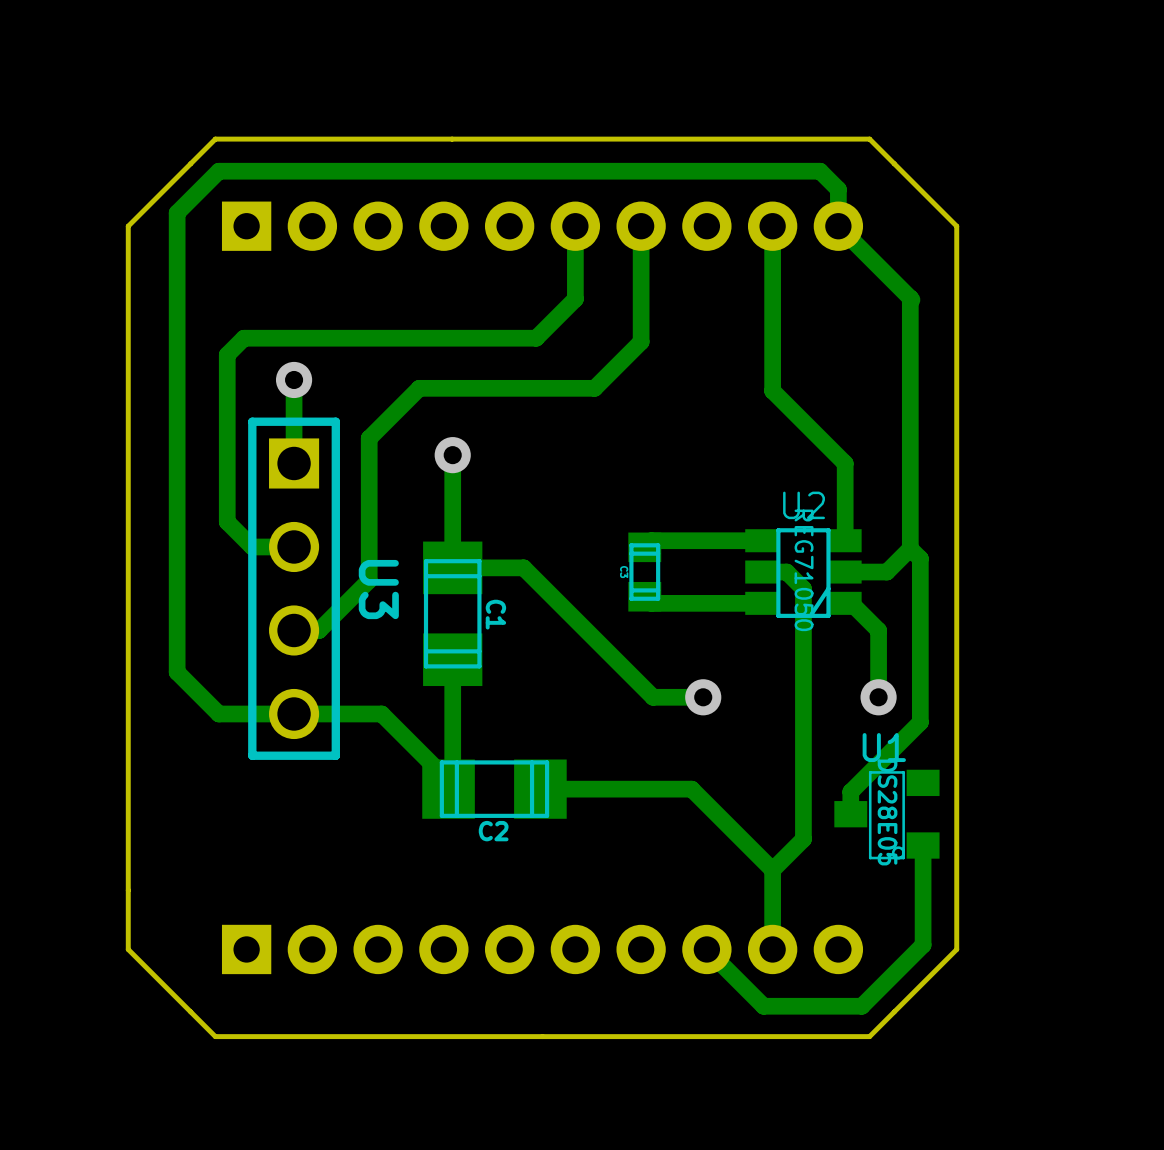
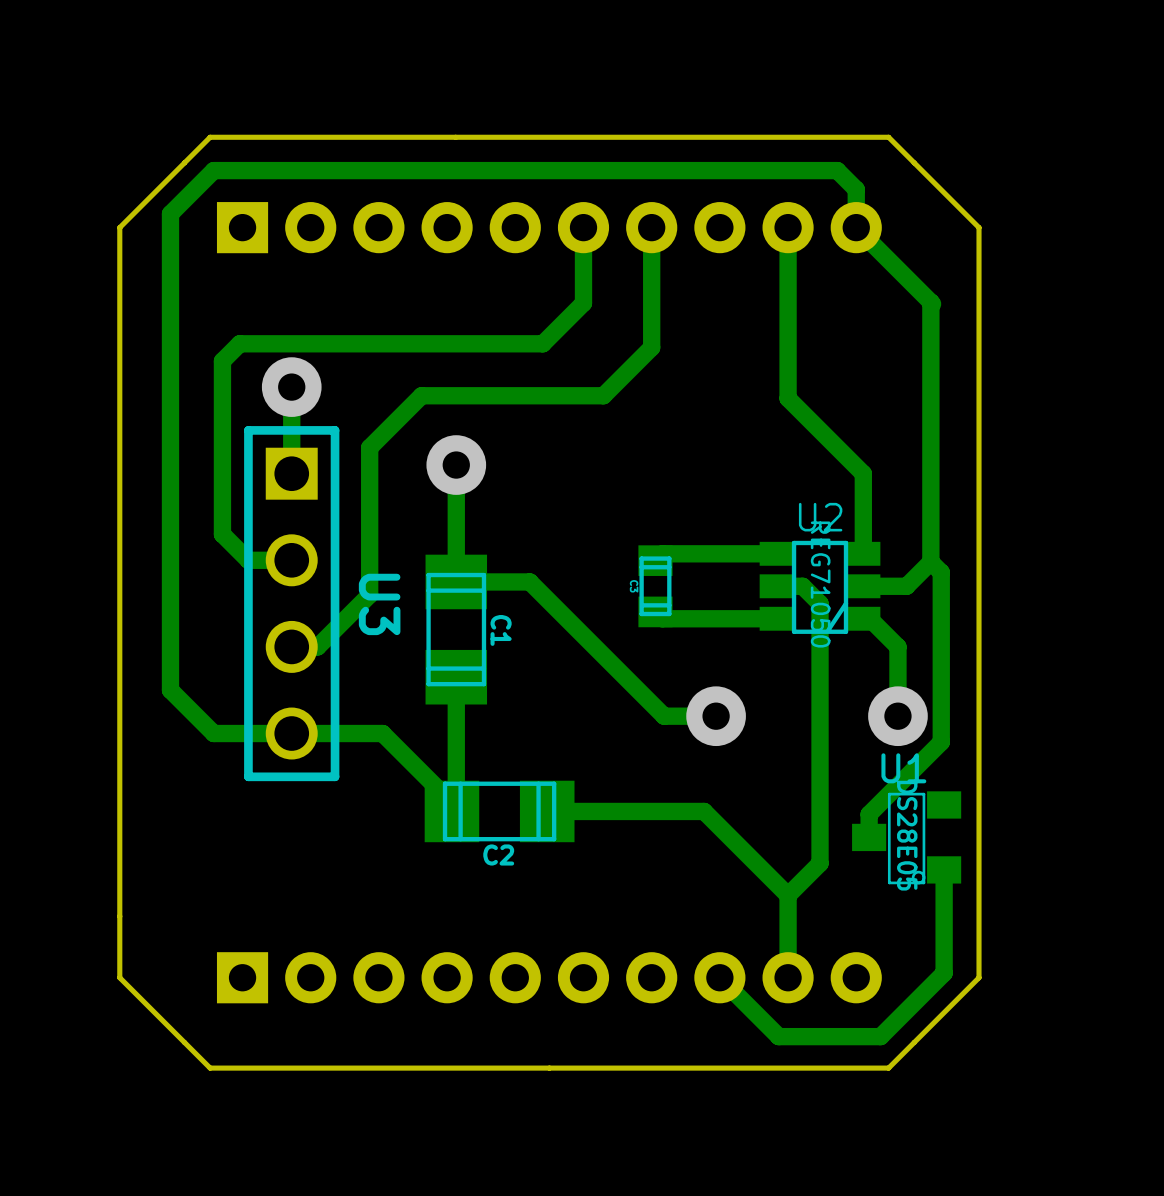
via size: [275, 361, 313, 399] -> [261, 357, 322, 417]
via size: [434, 437, 471, 474] -> [426, 435, 487, 495]
via size: [685, 679, 722, 716] -> [686, 686, 746, 747]
via size: [860, 679, 897, 716] -> [868, 686, 928, 747]

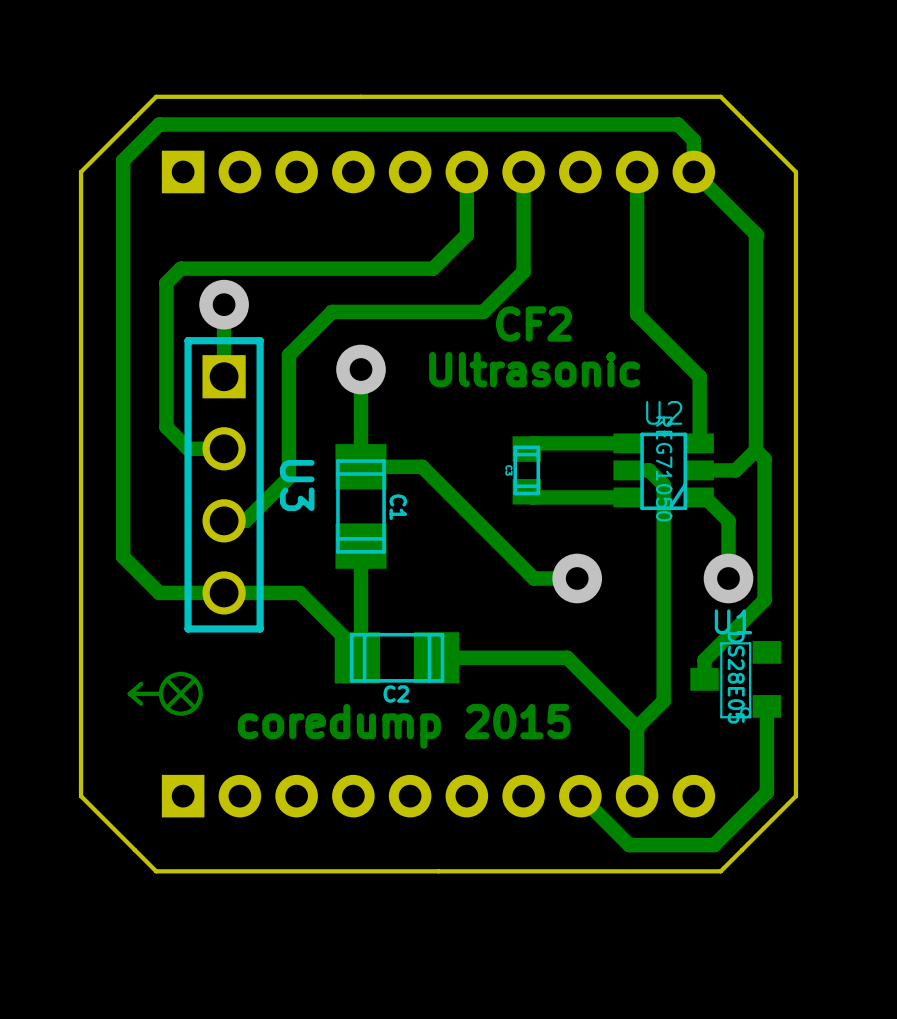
text: none -> CF2 (533, 324)
text: none -> Ultrasonic (534, 369)
drawing: none -> [127, 671, 203, 716]
text: none -> coredump 2015 (404, 726)

